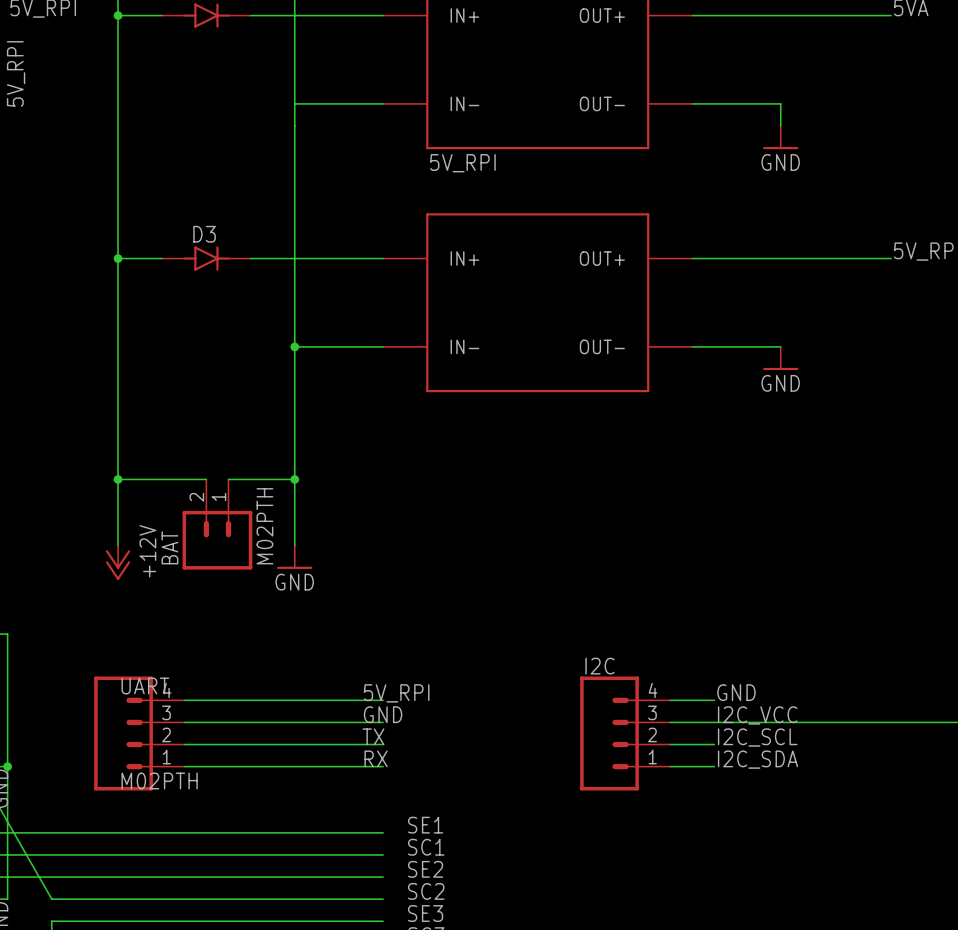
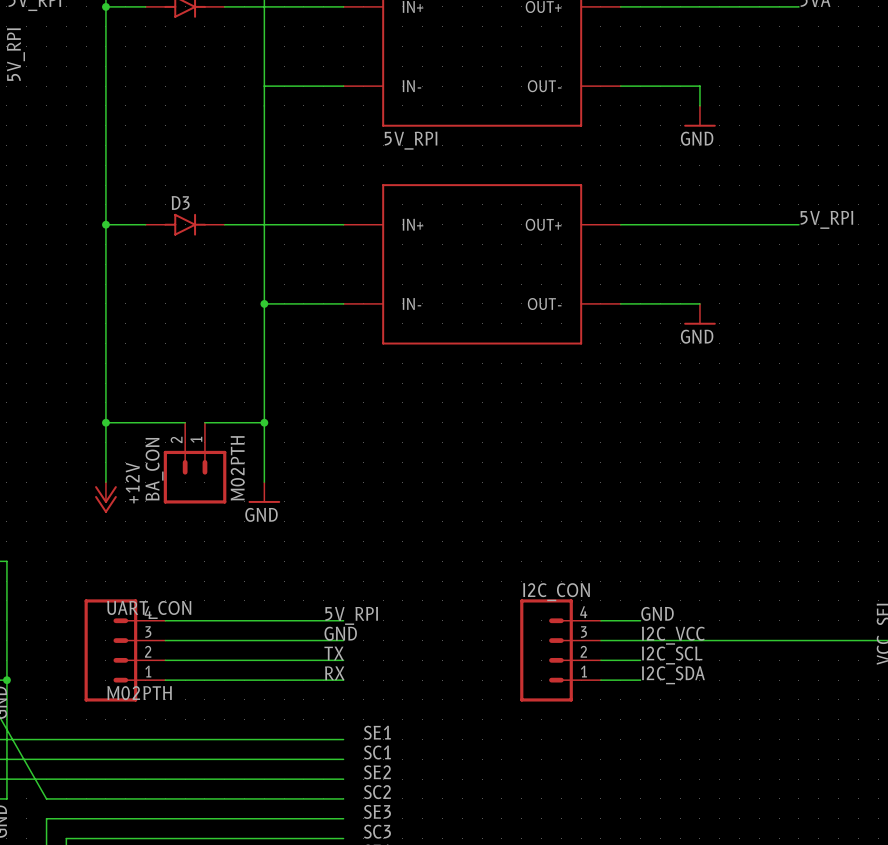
BAT name: BAT (169, 547) -> BA_CON (154, 469)
I2C name: I2C (599, 666) -> I2C_CON (556, 592)
UART name: UART (145, 685) -> UART_CON (149, 609)

